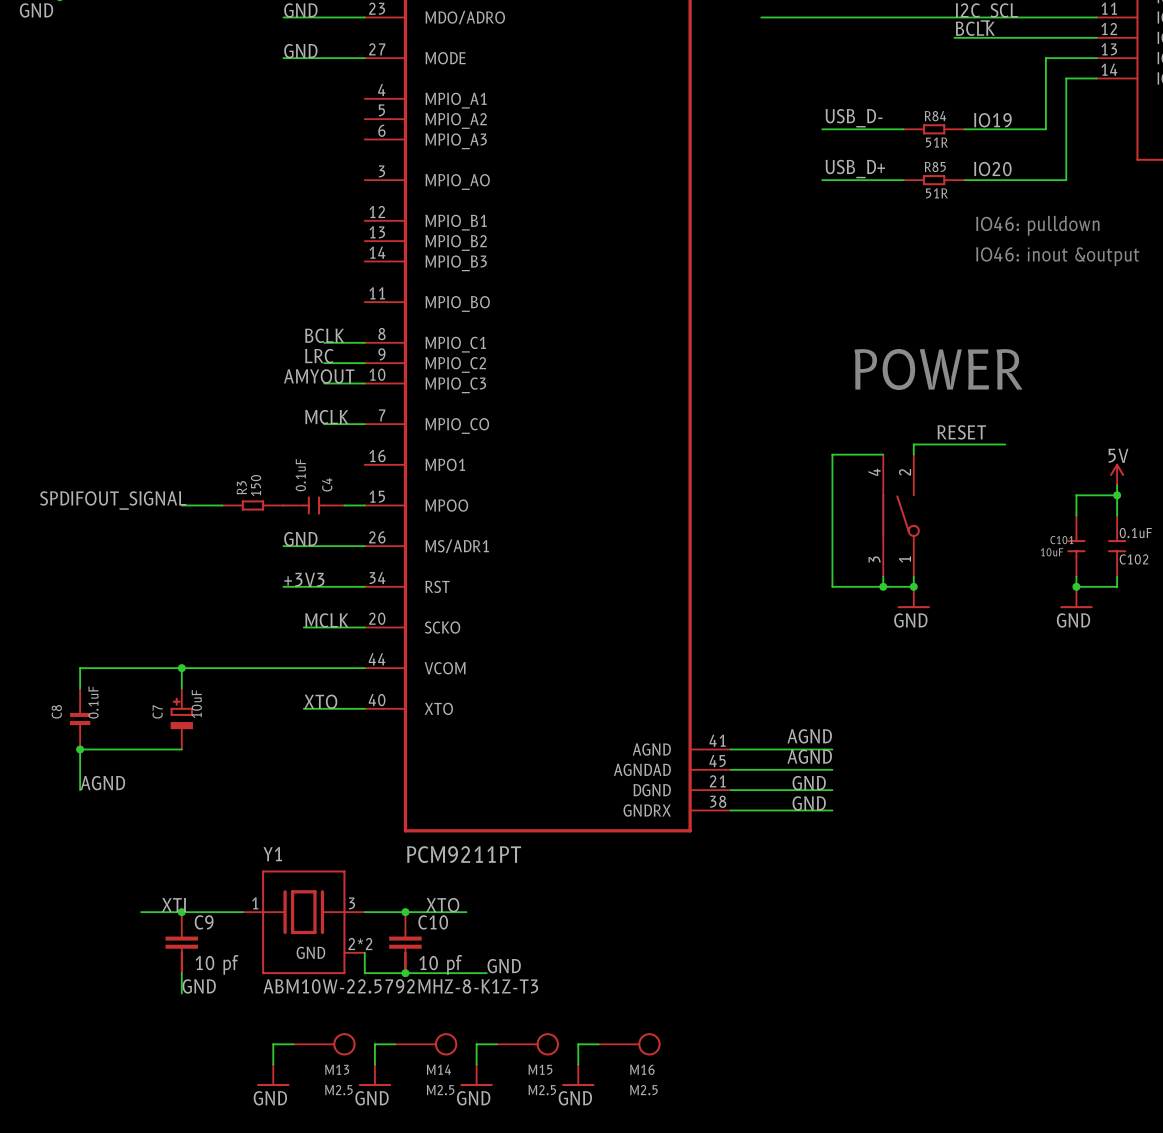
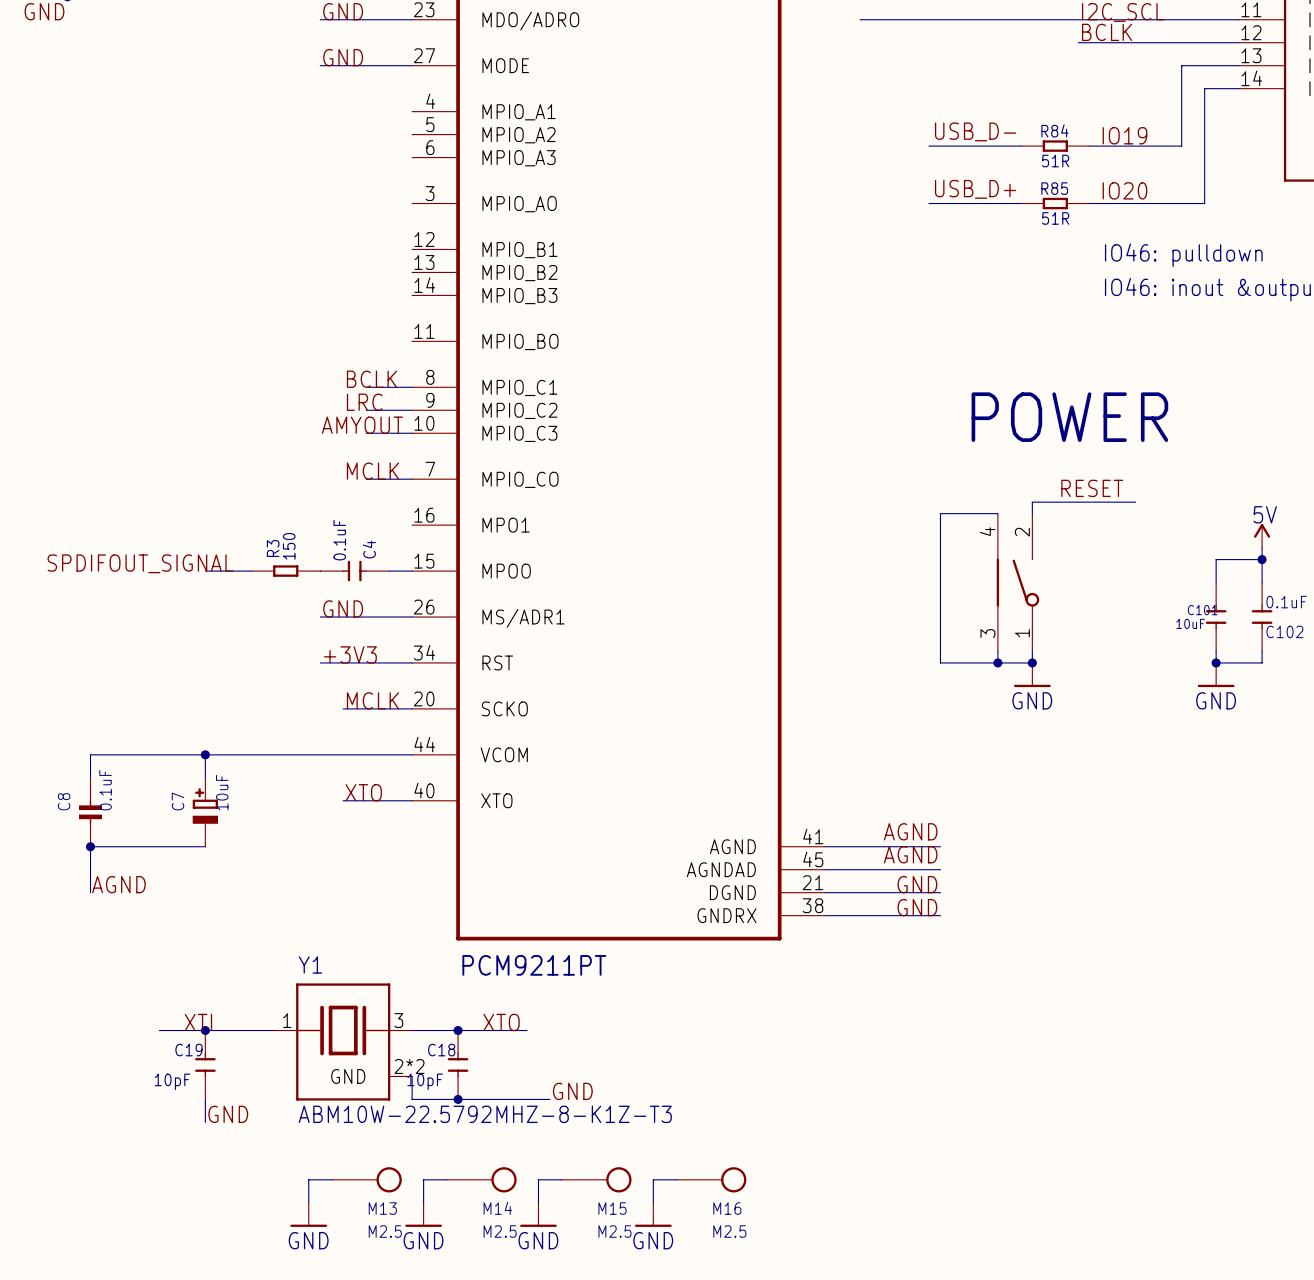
C9: 10 pf (181, 942) -> none
C19: none -> 10pF (205, 1064)
C10: 10 pf (405, 942) -> none
C18: none -> 10pF (458, 1064)

